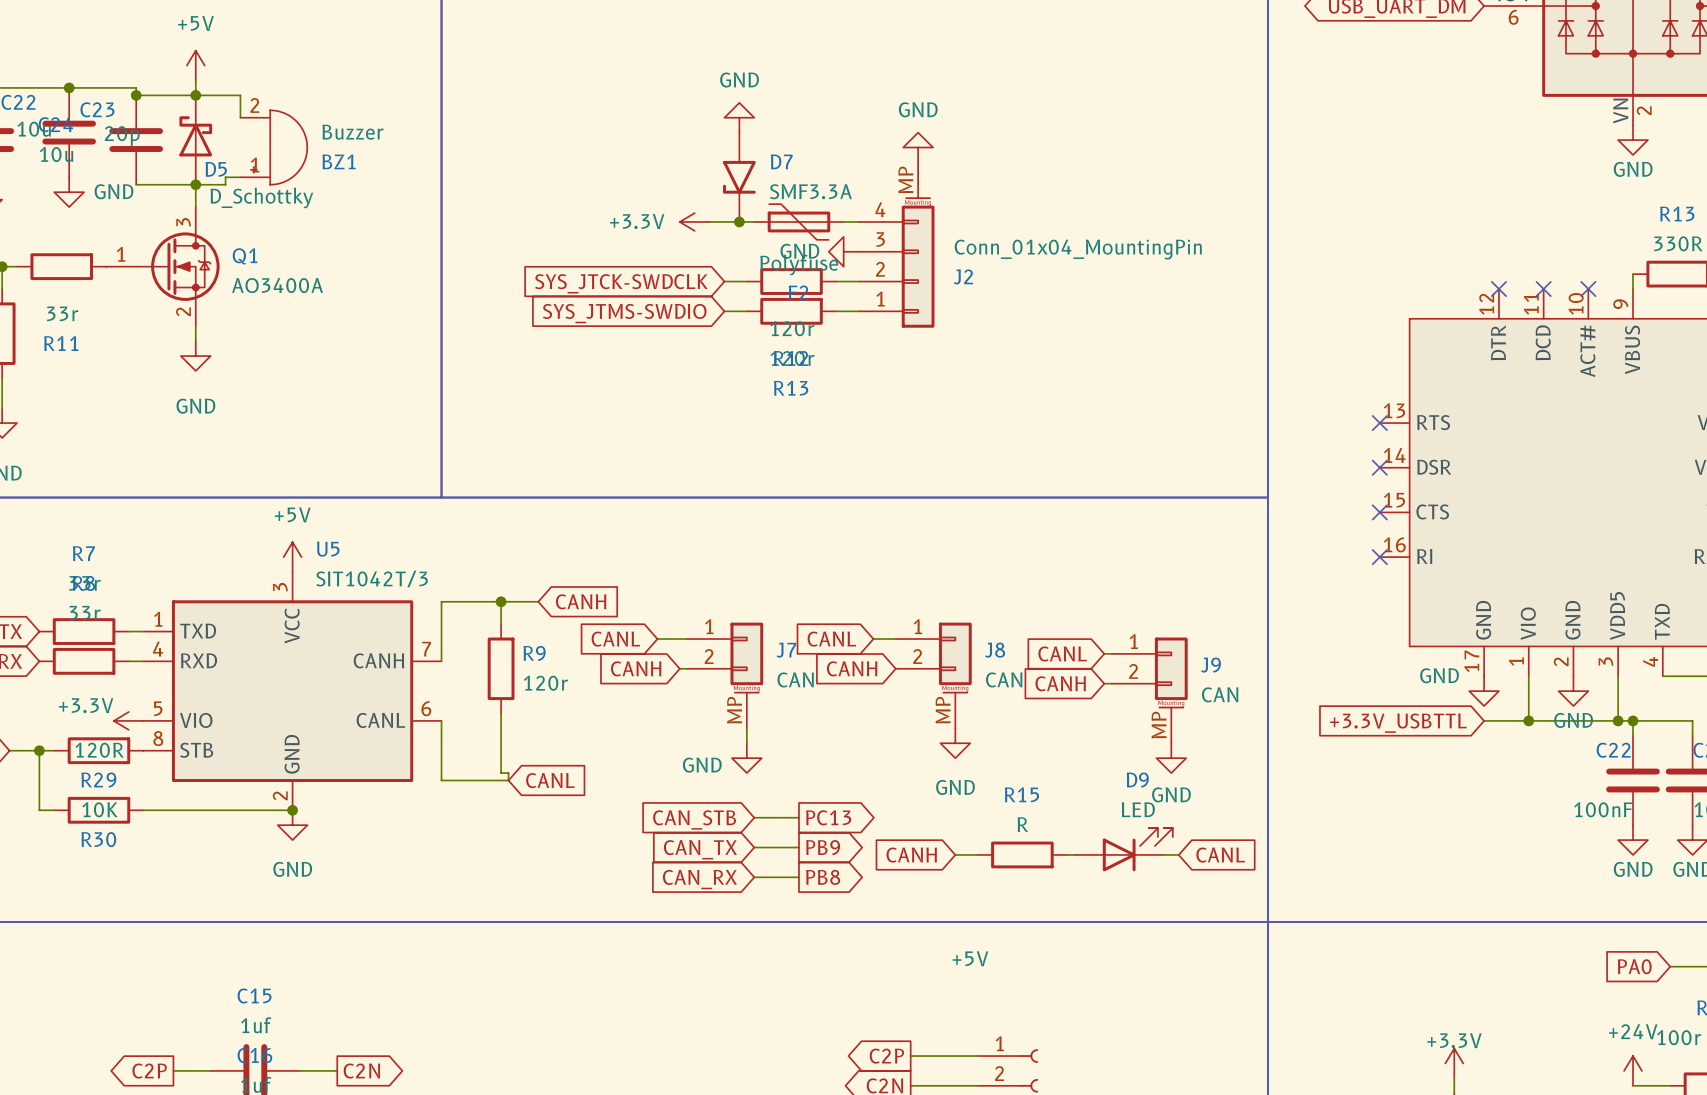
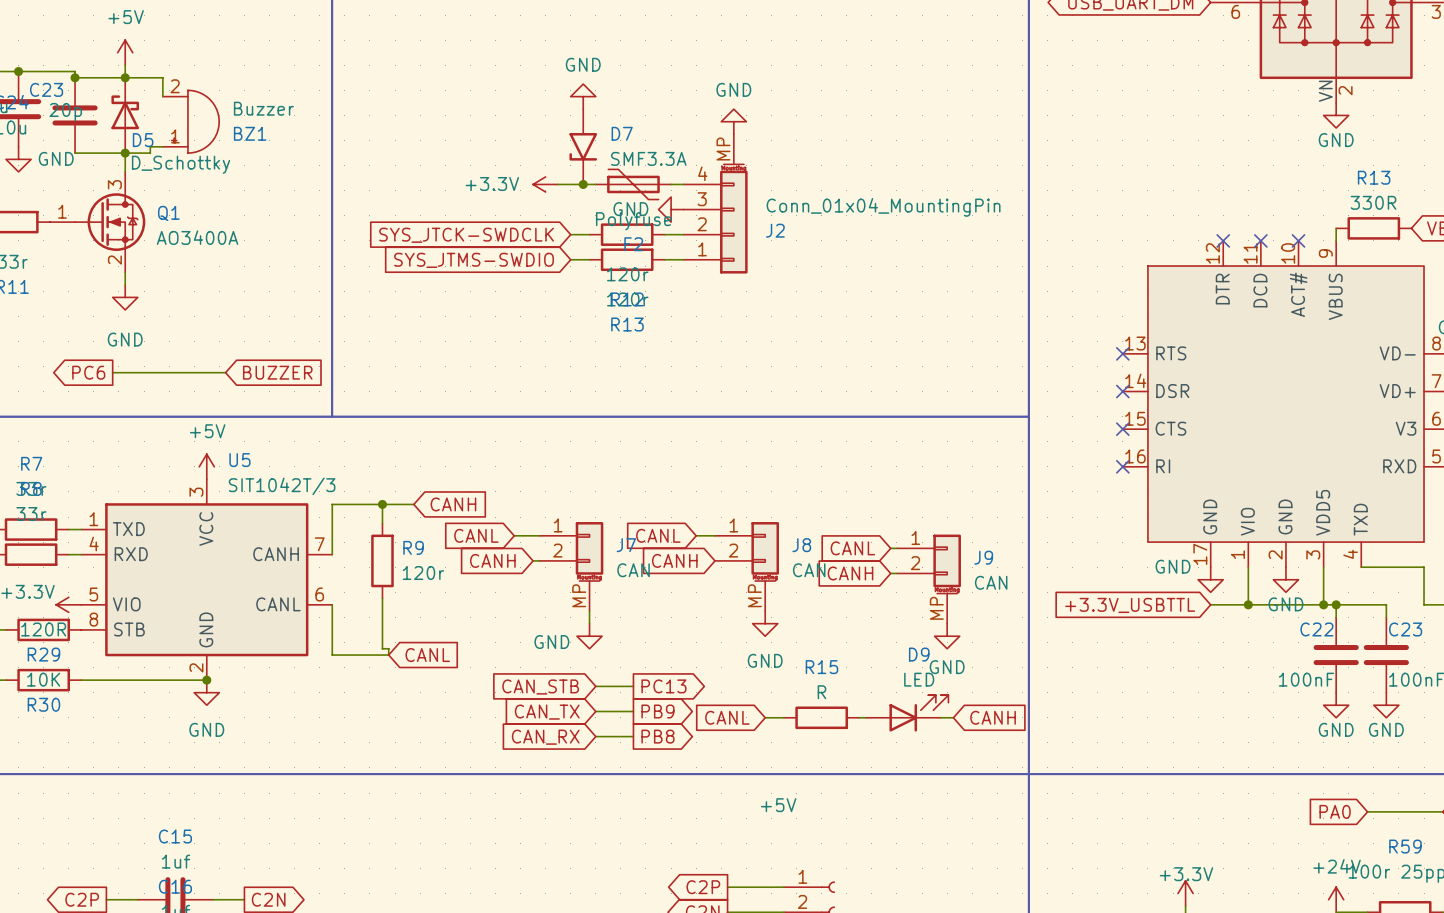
global label: none -> PC6 (88, 372)
wire: none -> (112, 372) (225, 372)
global label: none -> BUZZER (277, 372)
global label: CANH (911, 855) -> CANL (727, 717)
global label: CANL (1220, 855) -> CANH (993, 717)

